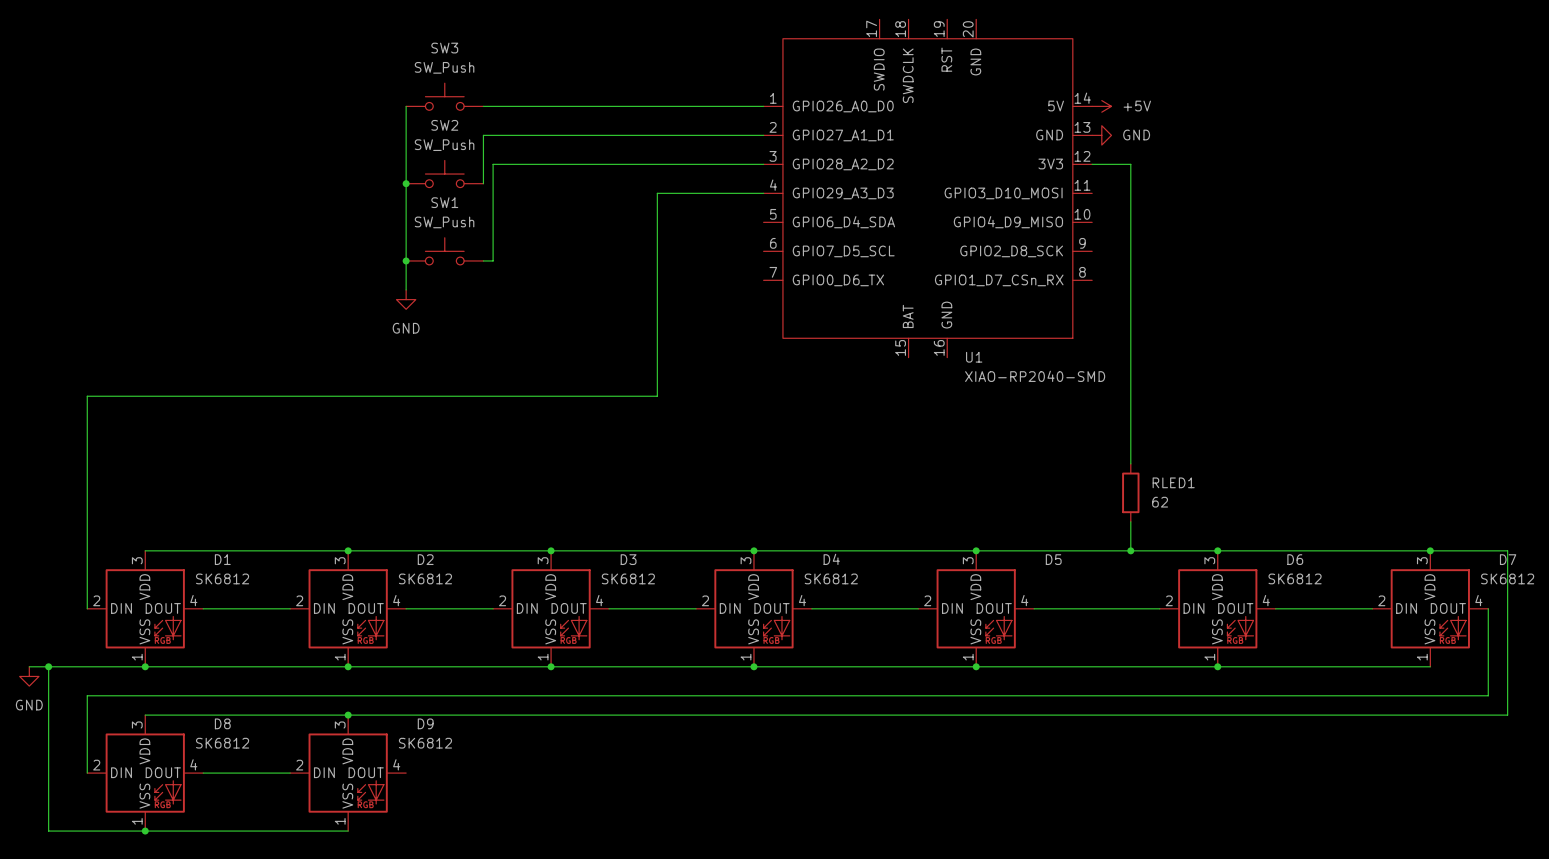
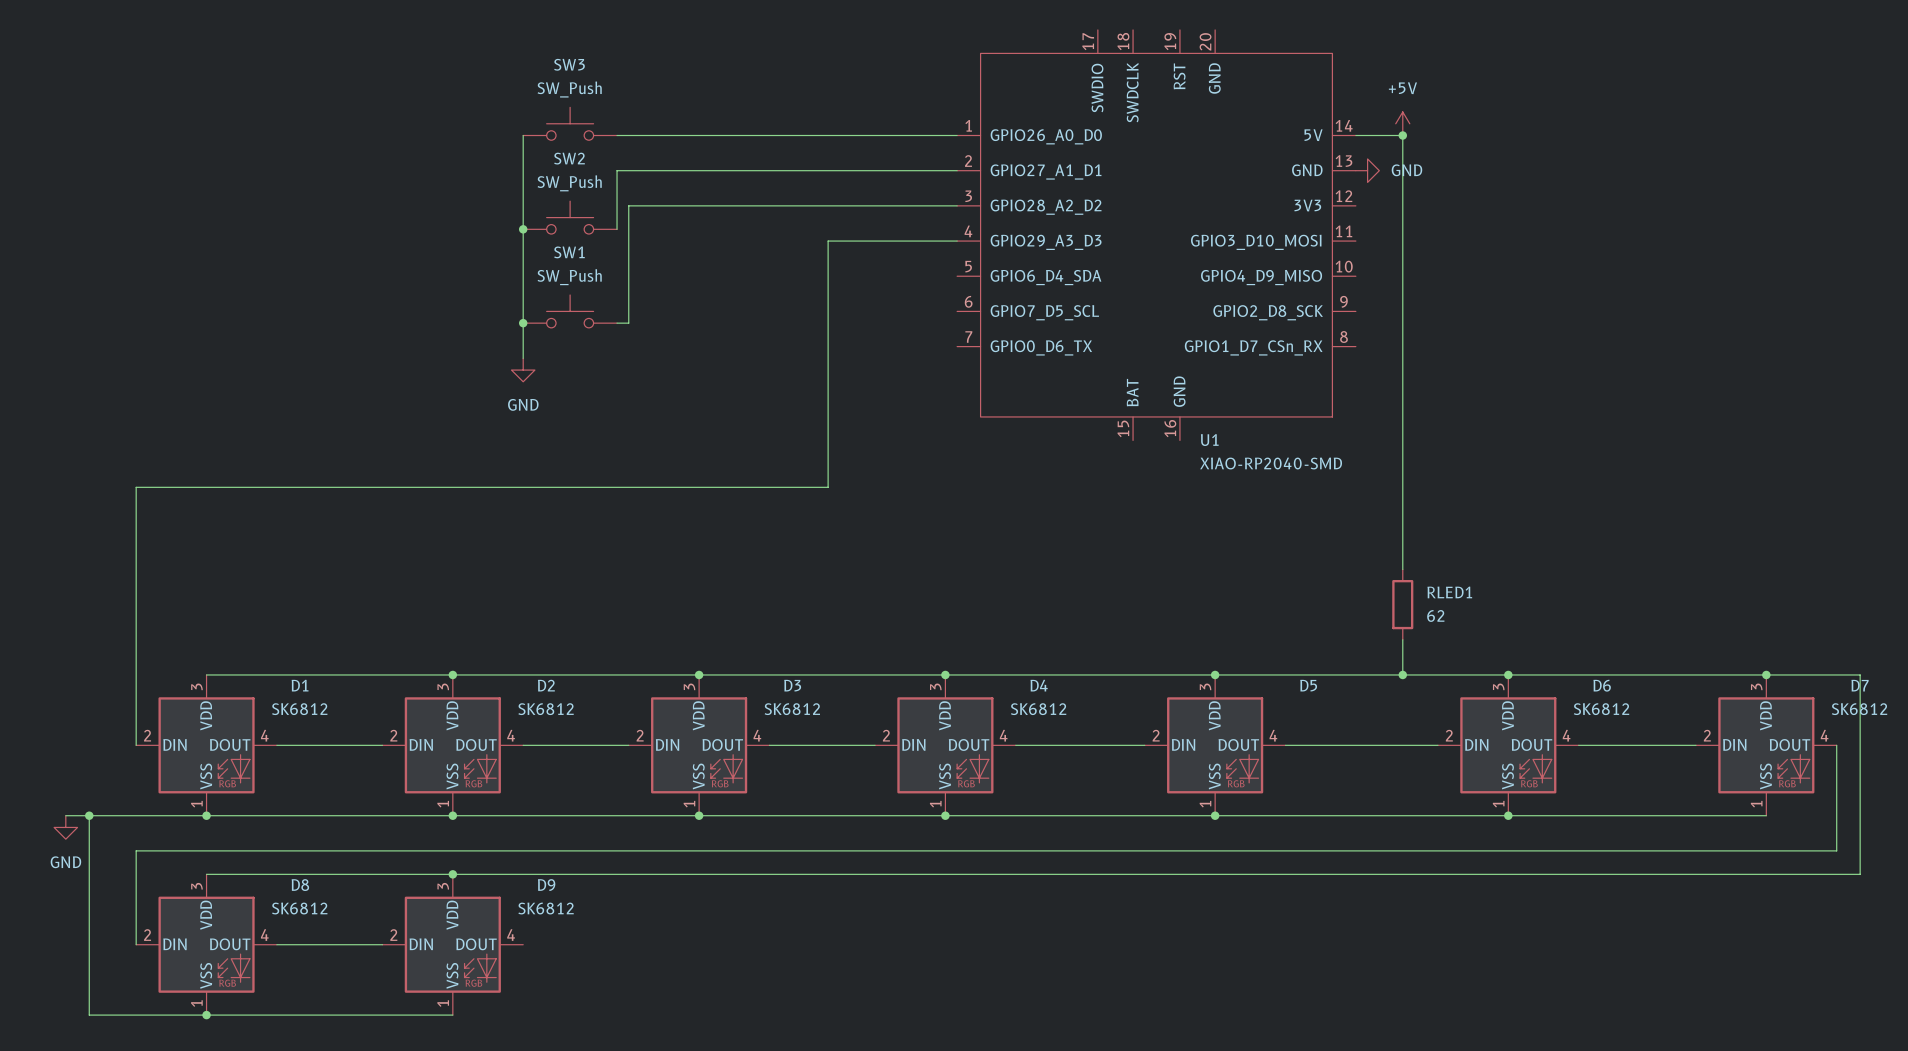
power symbol rotation: 0° (1101, 106) -> 90° counterclockwise (1402, 123)
power symbol position: +5V (1101, 106) -> +5V (1402, 123)
junction: none -> (1402, 135)
wire: (1092, 164) (1130, 164) -> (1355, 135) (1402, 135) (1402, 205)

